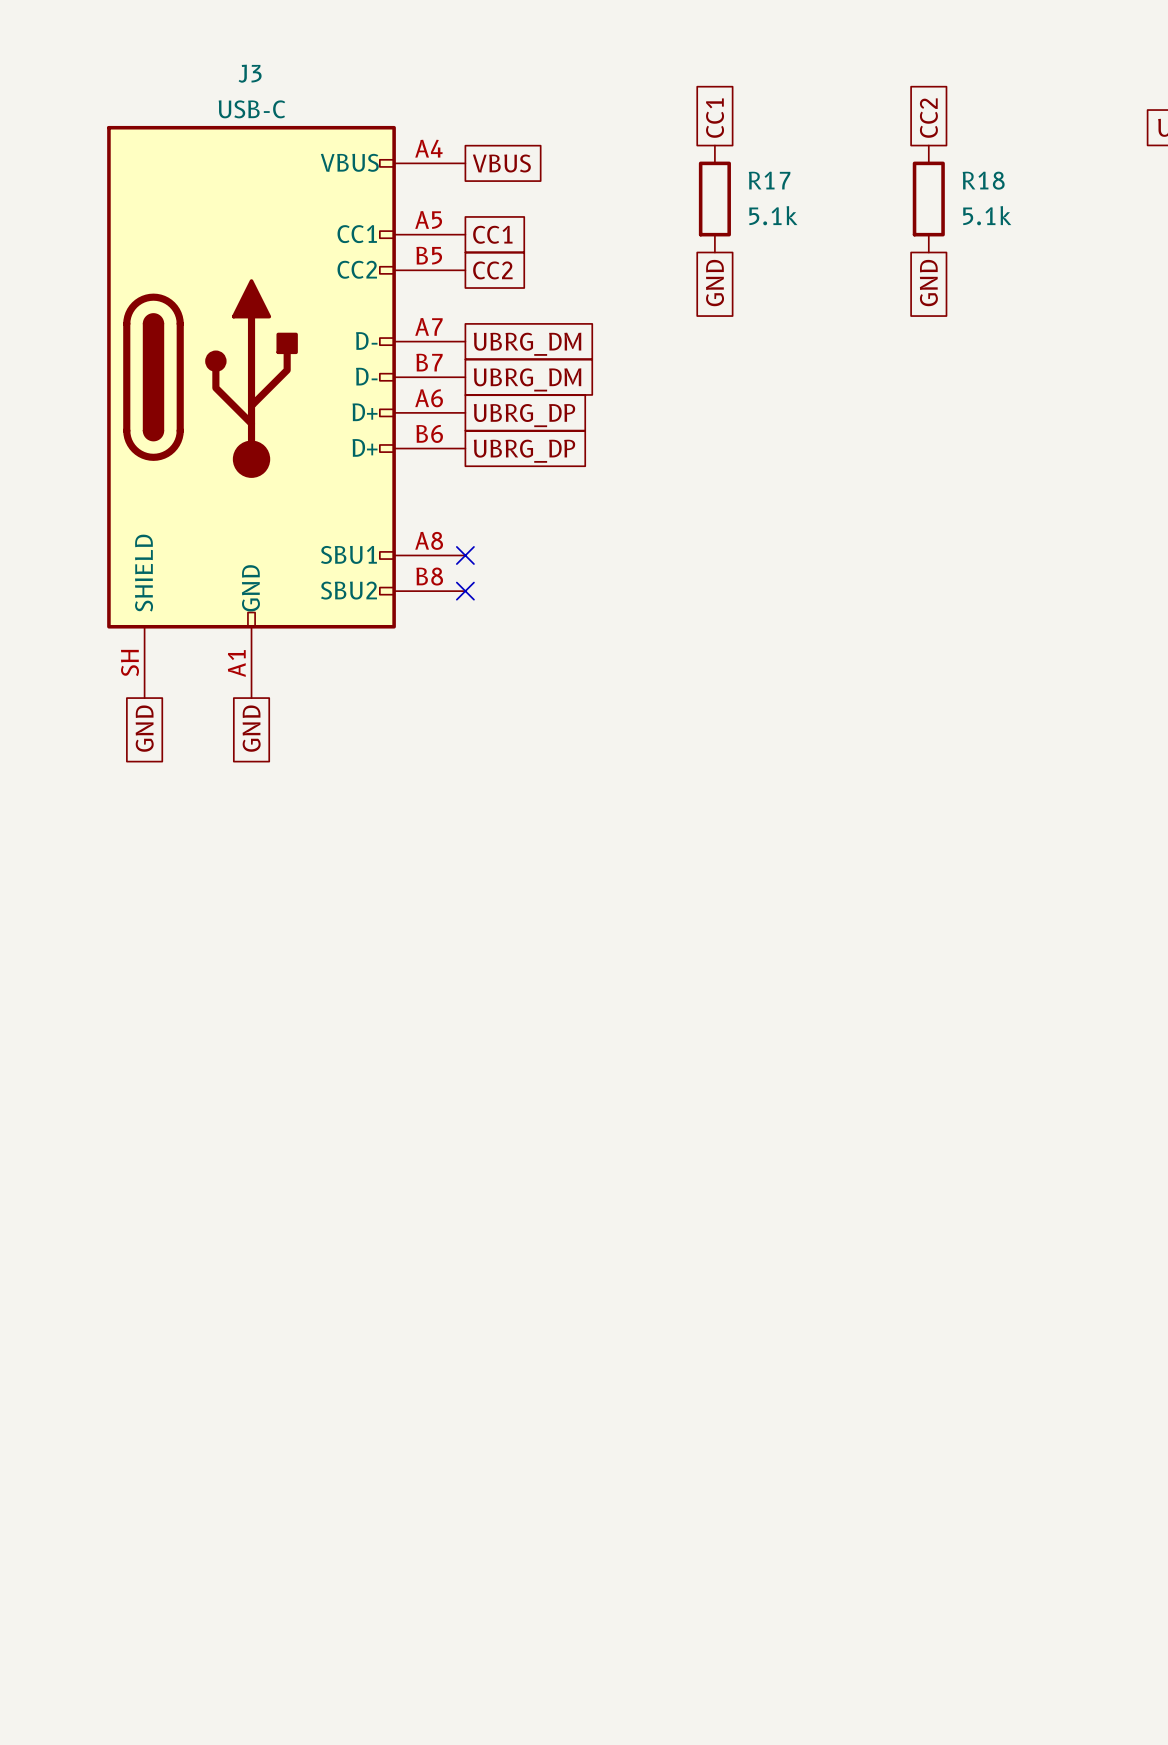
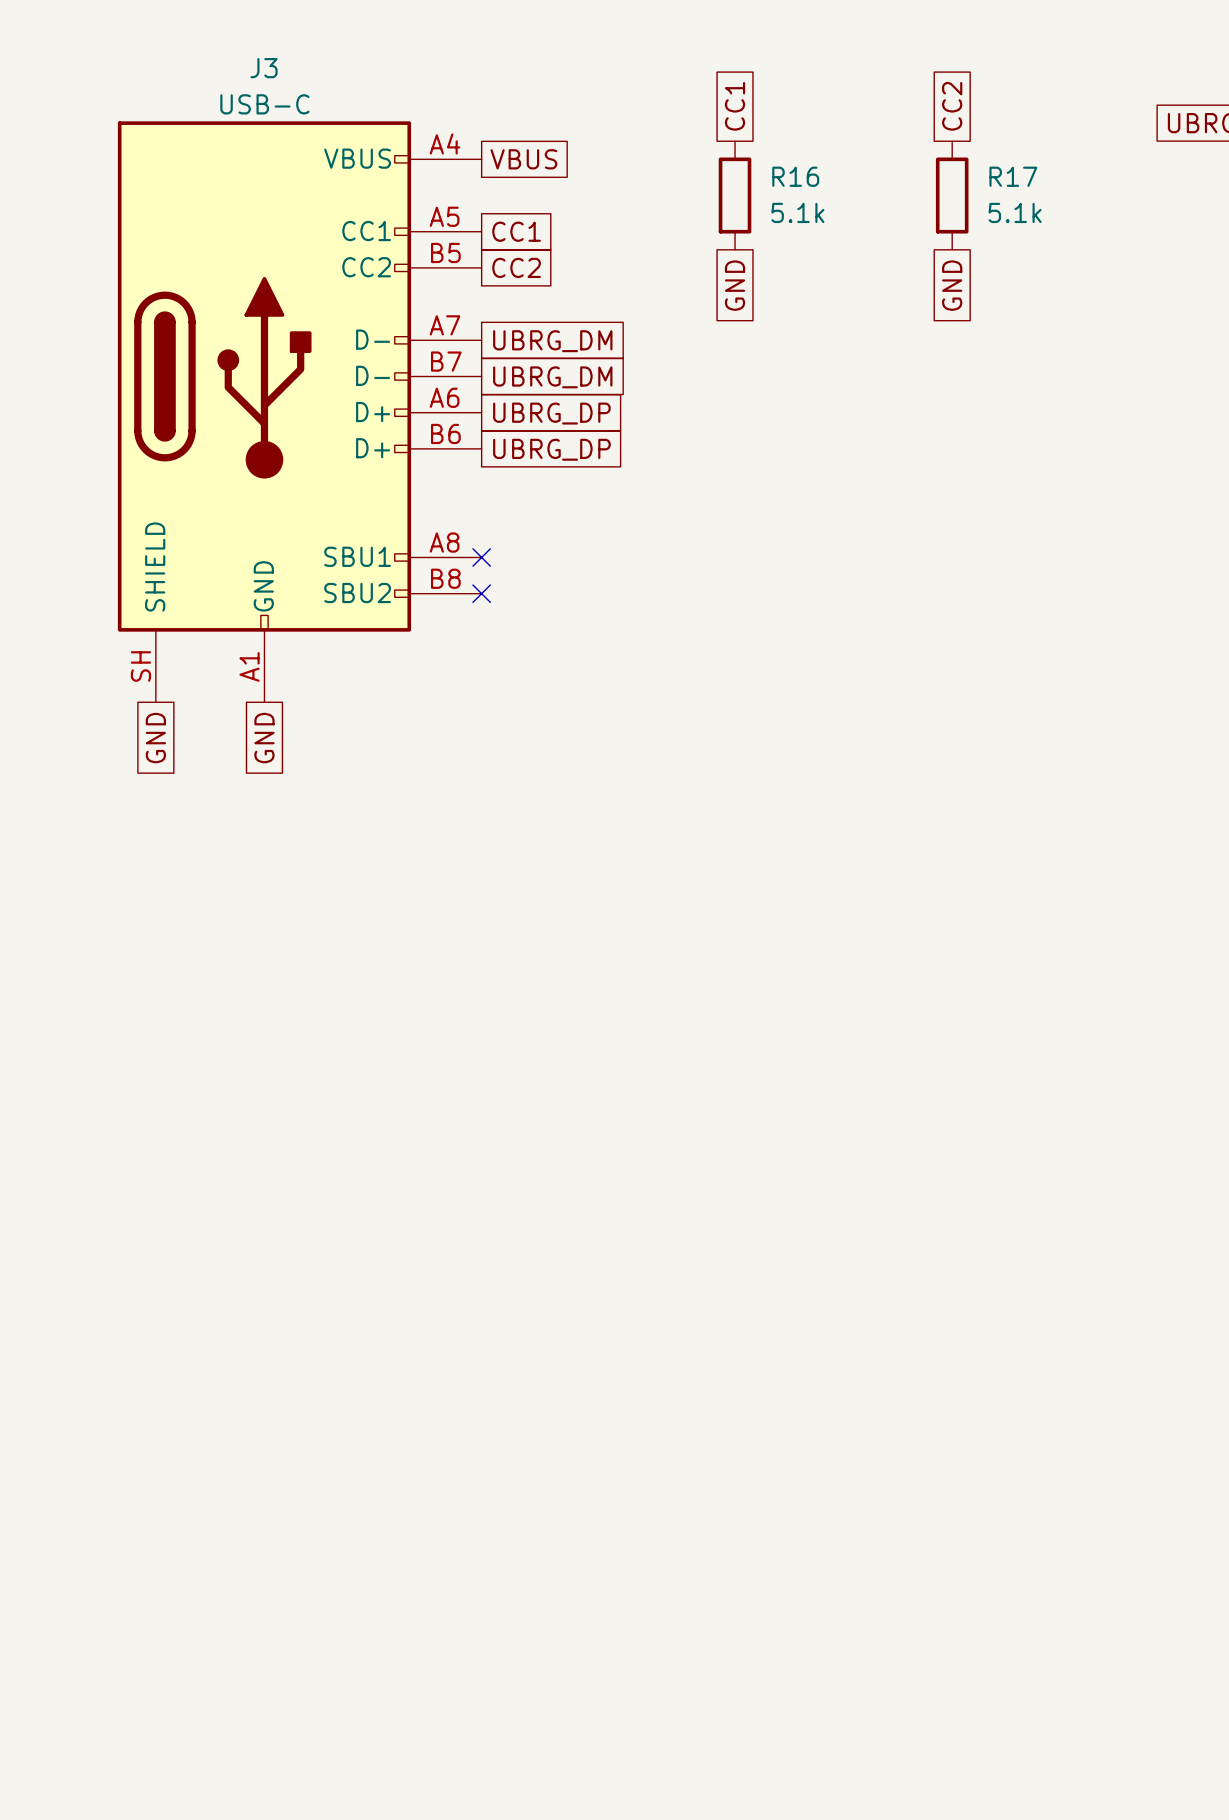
R17 name: R17 (769, 180) -> R16 (795, 176)
R18 name: R18 (983, 180) -> R17 (1013, 176)

